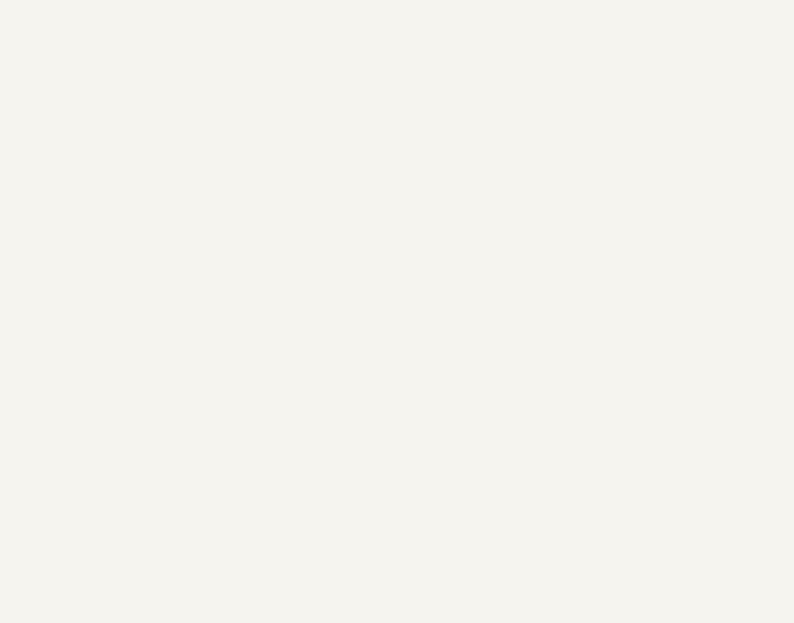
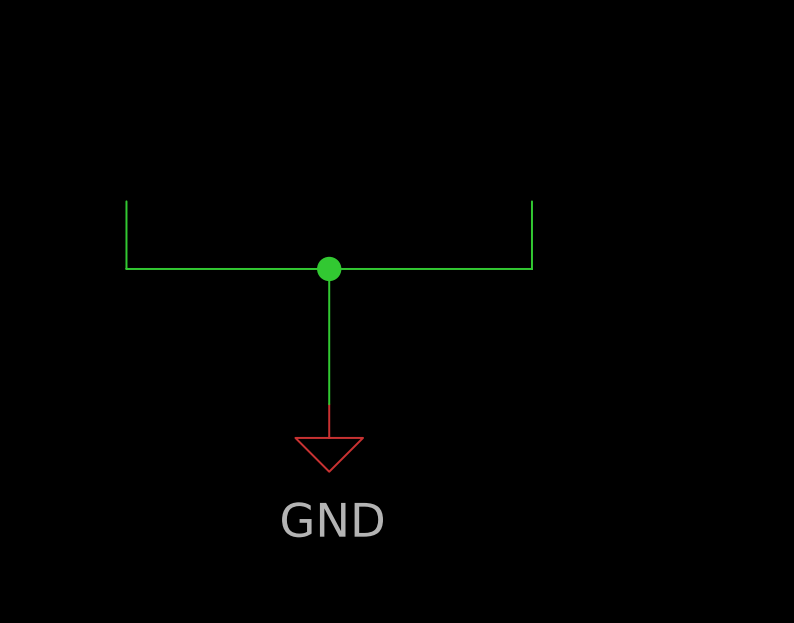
wire: none -> (126, 201) (126, 268) (531, 268) (531, 201)
wire: none -> (329, 268) (329, 404)
junction: none -> (329, 268)
power symbol: none -> GND (329, 437)

